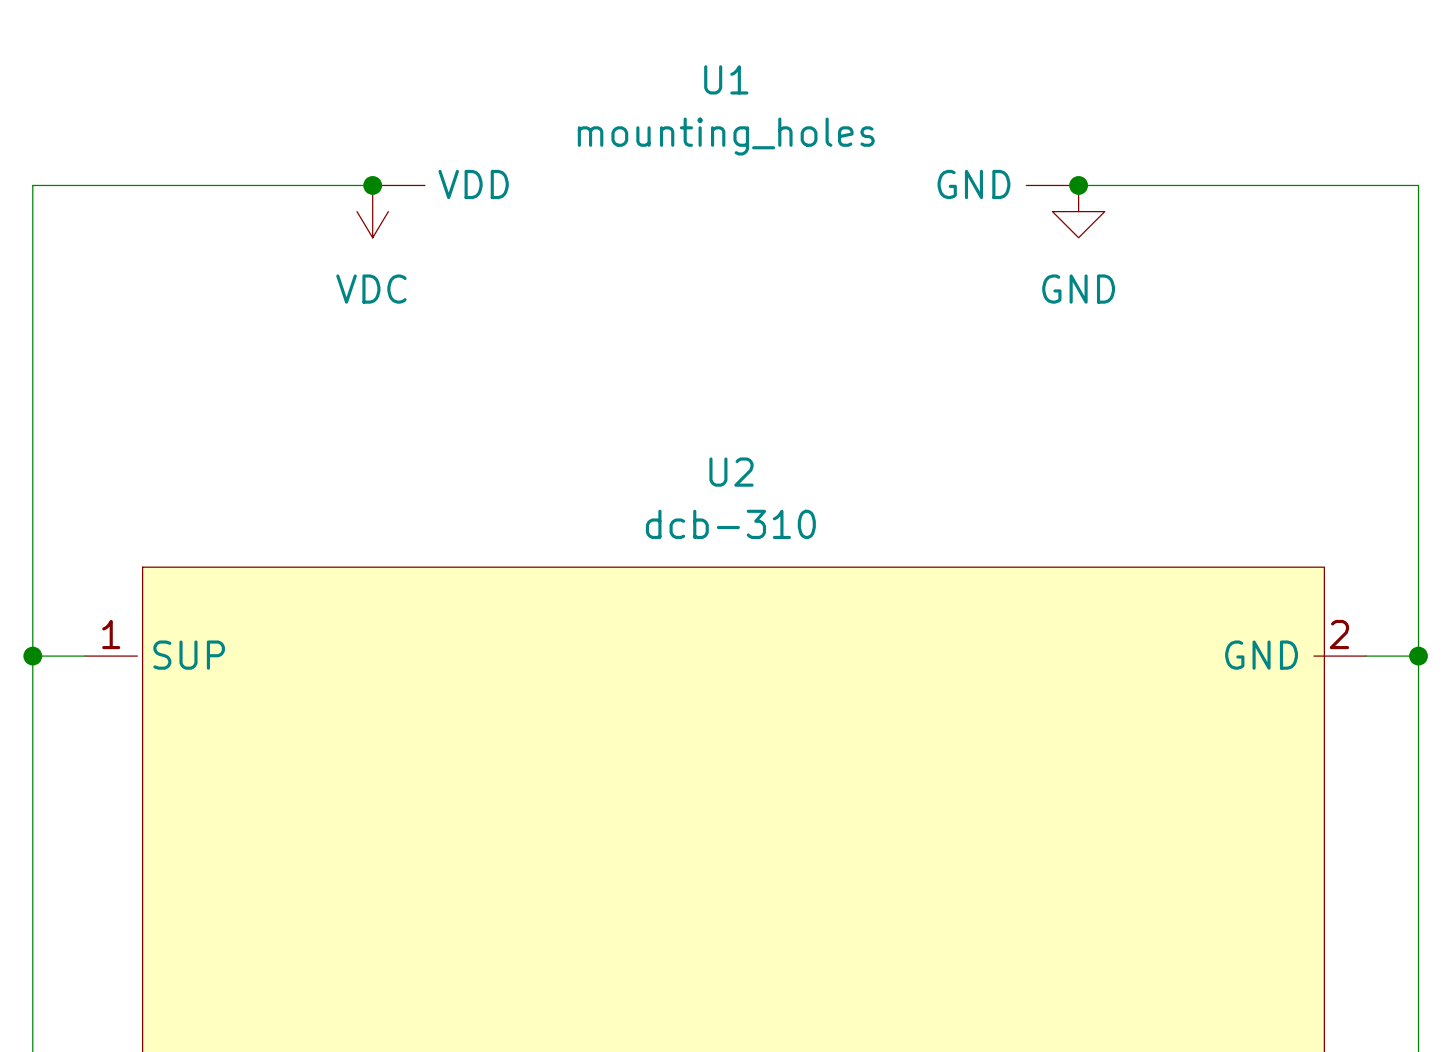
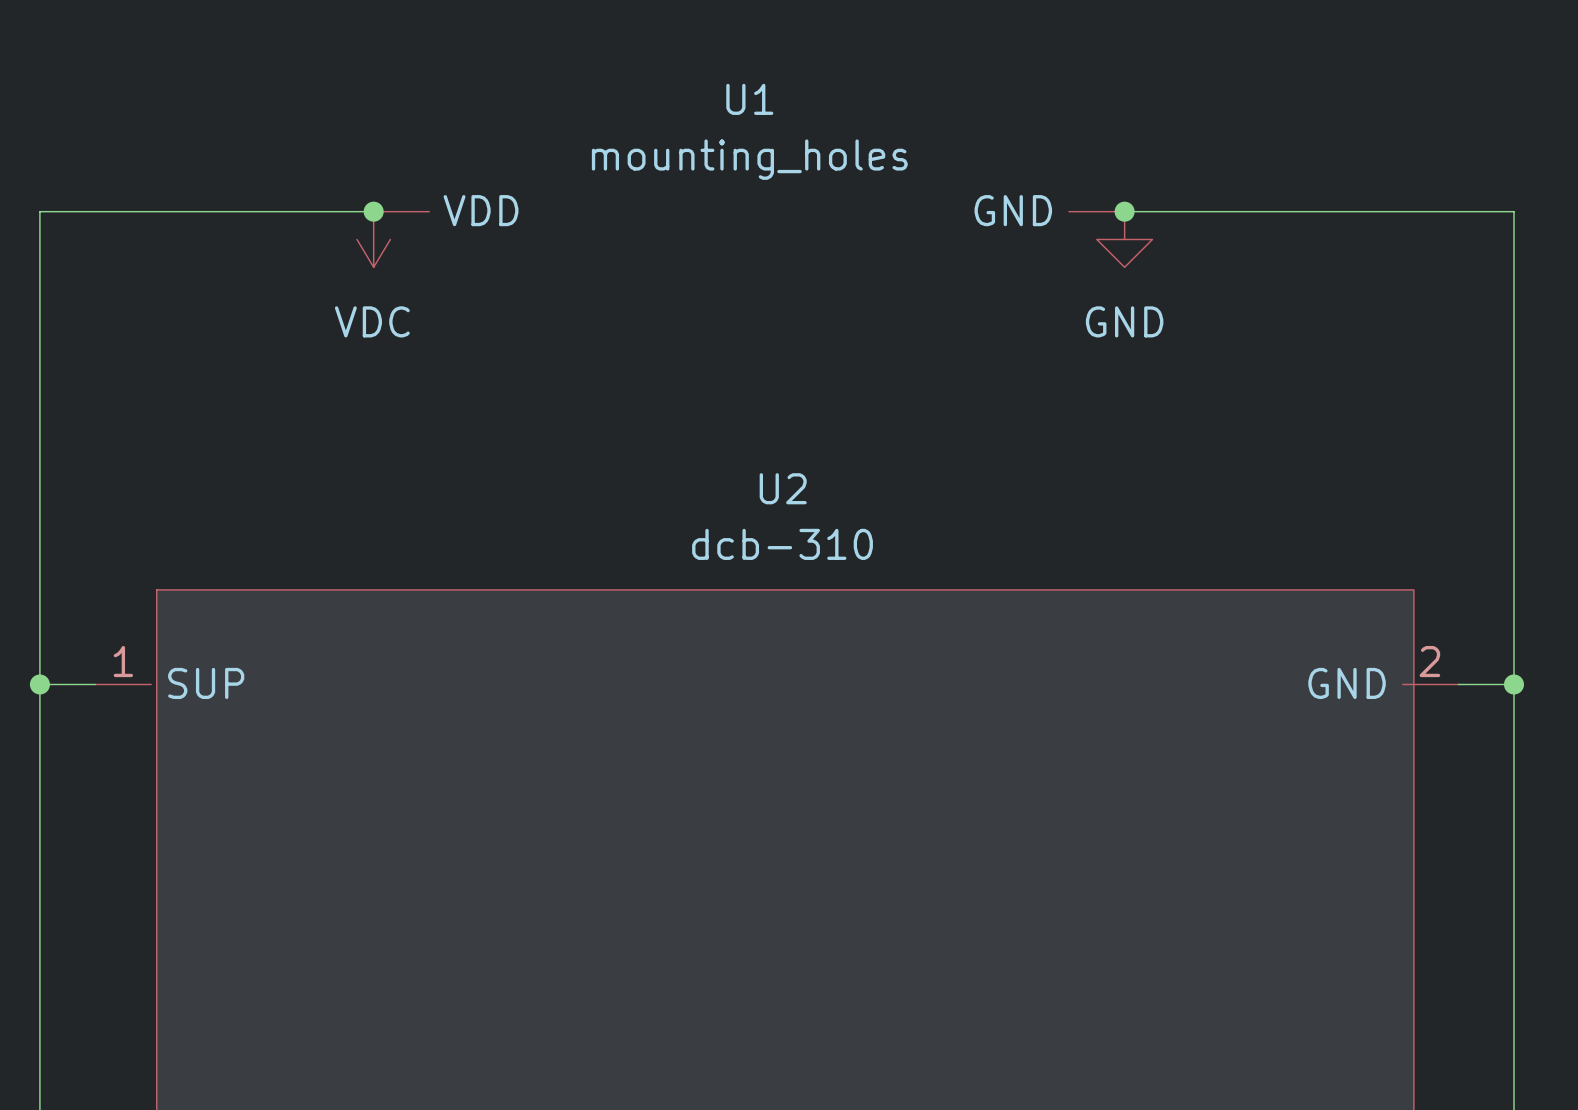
wire: (372, 185) (32, 185) (32, 211) -> (373, 211) (39, 211)
junction position: (372, 185) -> (373, 211)
U1 position: (725, 185) -> (749, 211)
wire: (1078, 185) (1418, 185) (1418, 211) -> (1124, 211) (1514, 211)
junction position: (1078, 185) -> (1124, 211)
power symbol position: VDC (372, 211) -> VDC (373, 239)
power symbol position: GND (1078, 211) -> GND (1124, 239)

